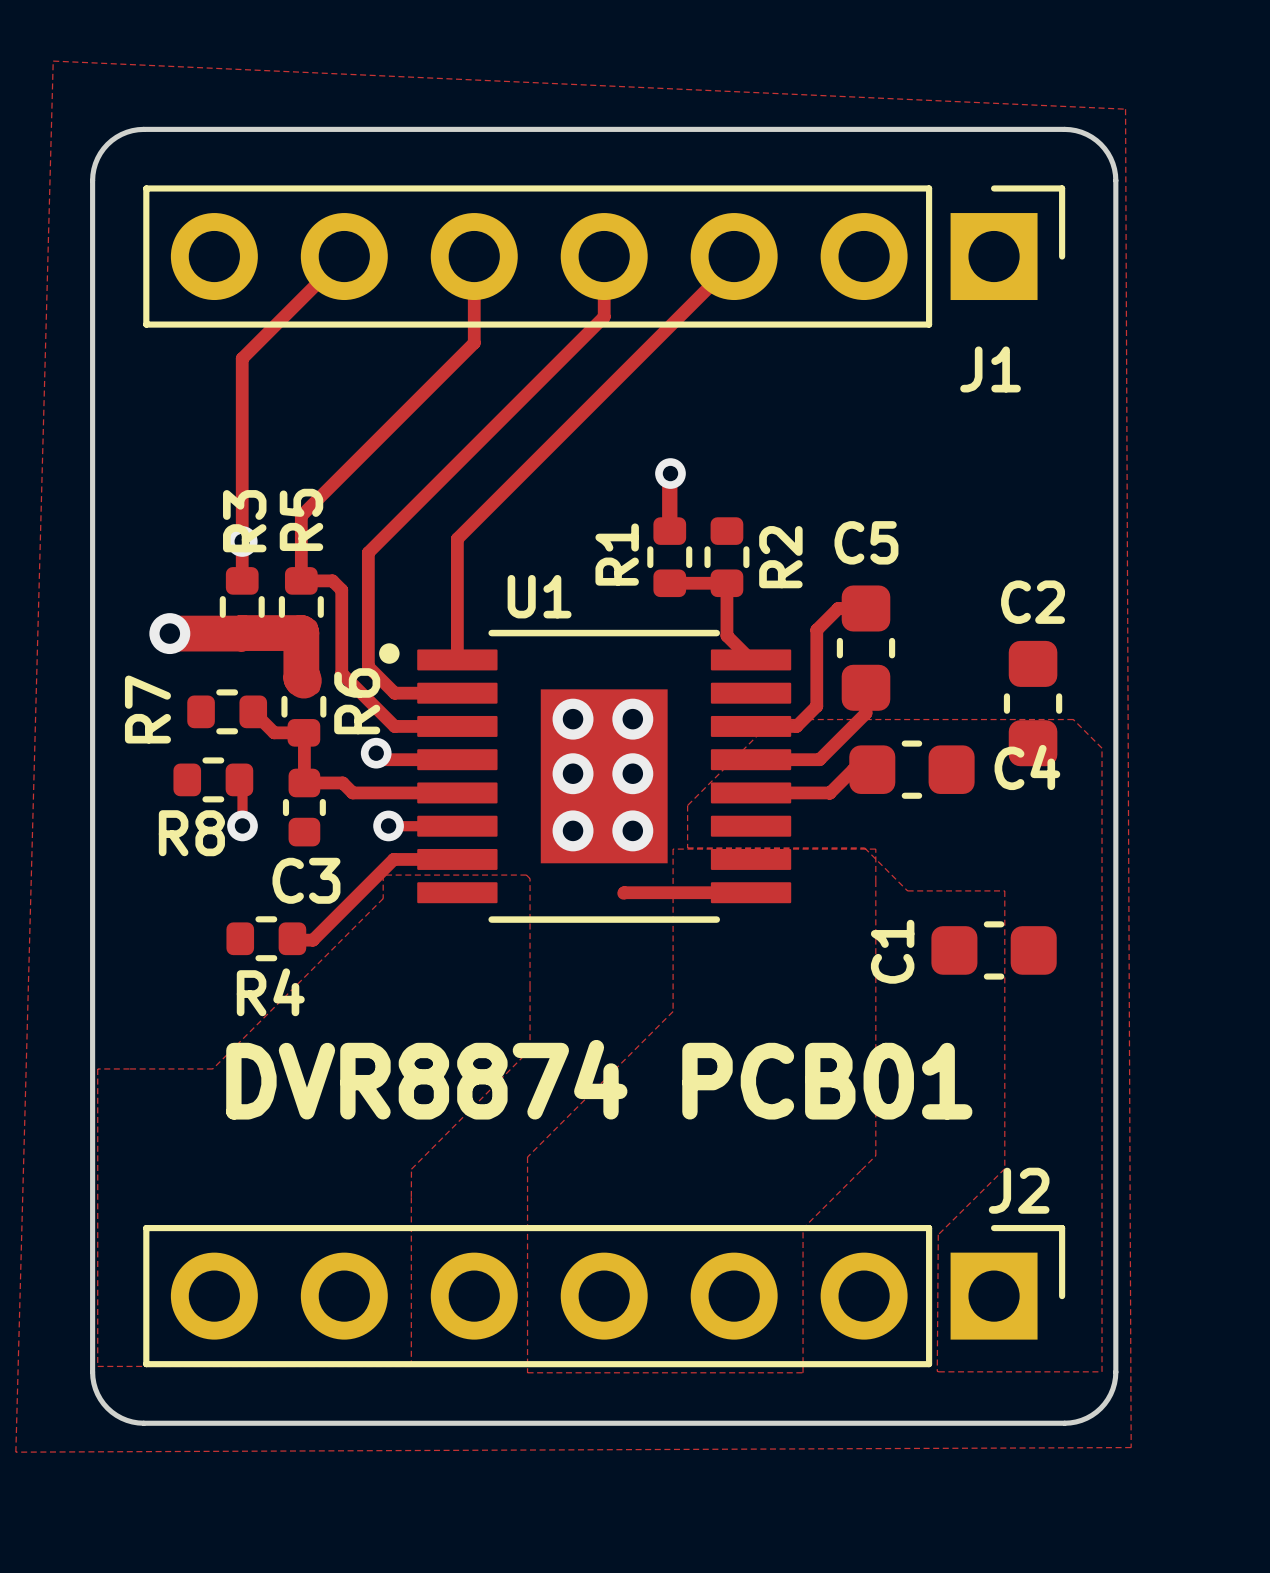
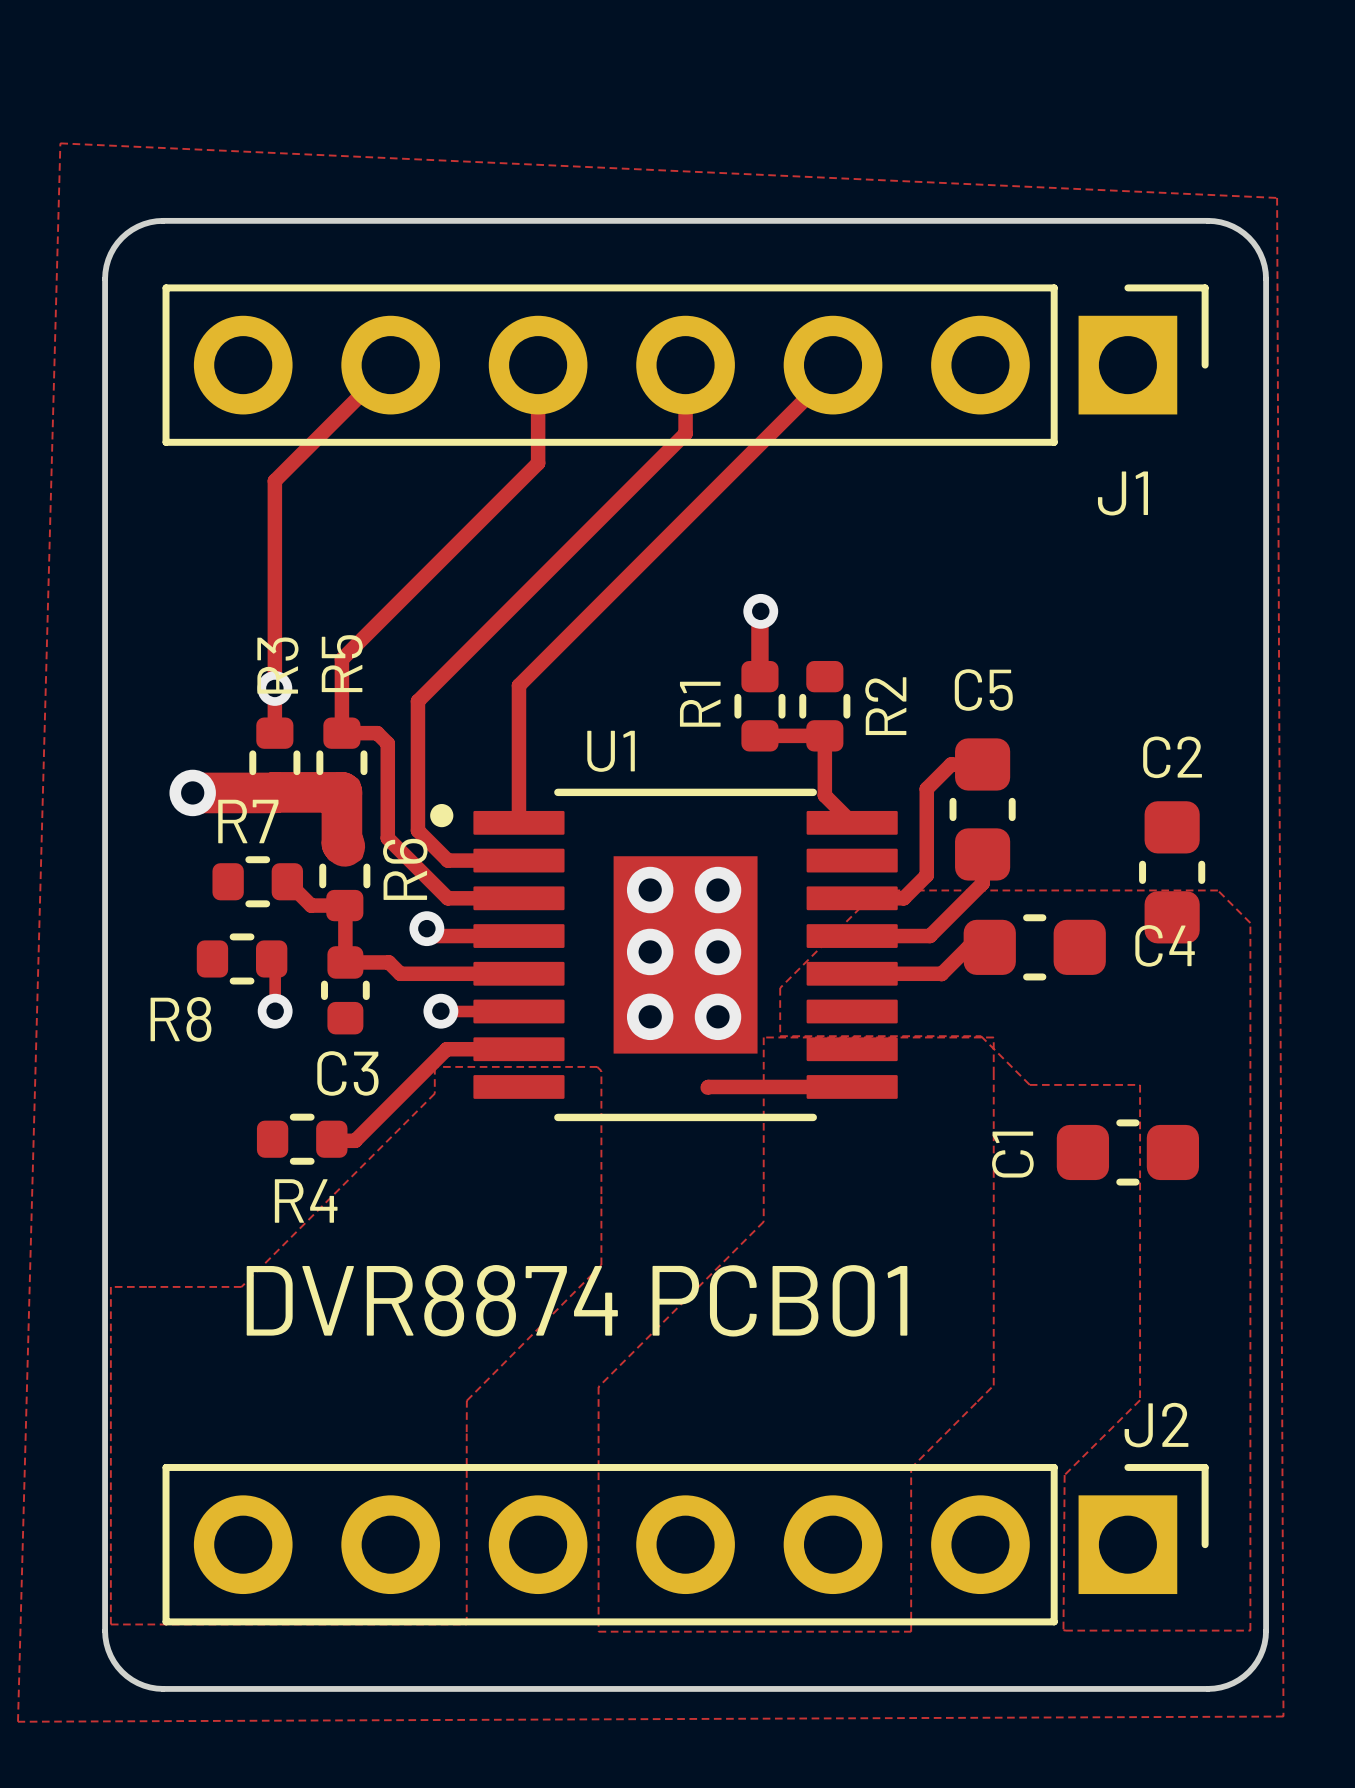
R7 name rotation: 0° (147, 709) -> 90° clockwise (248, 821)
R8 name position: R8 (191, 833) -> R8 (180, 1019)

